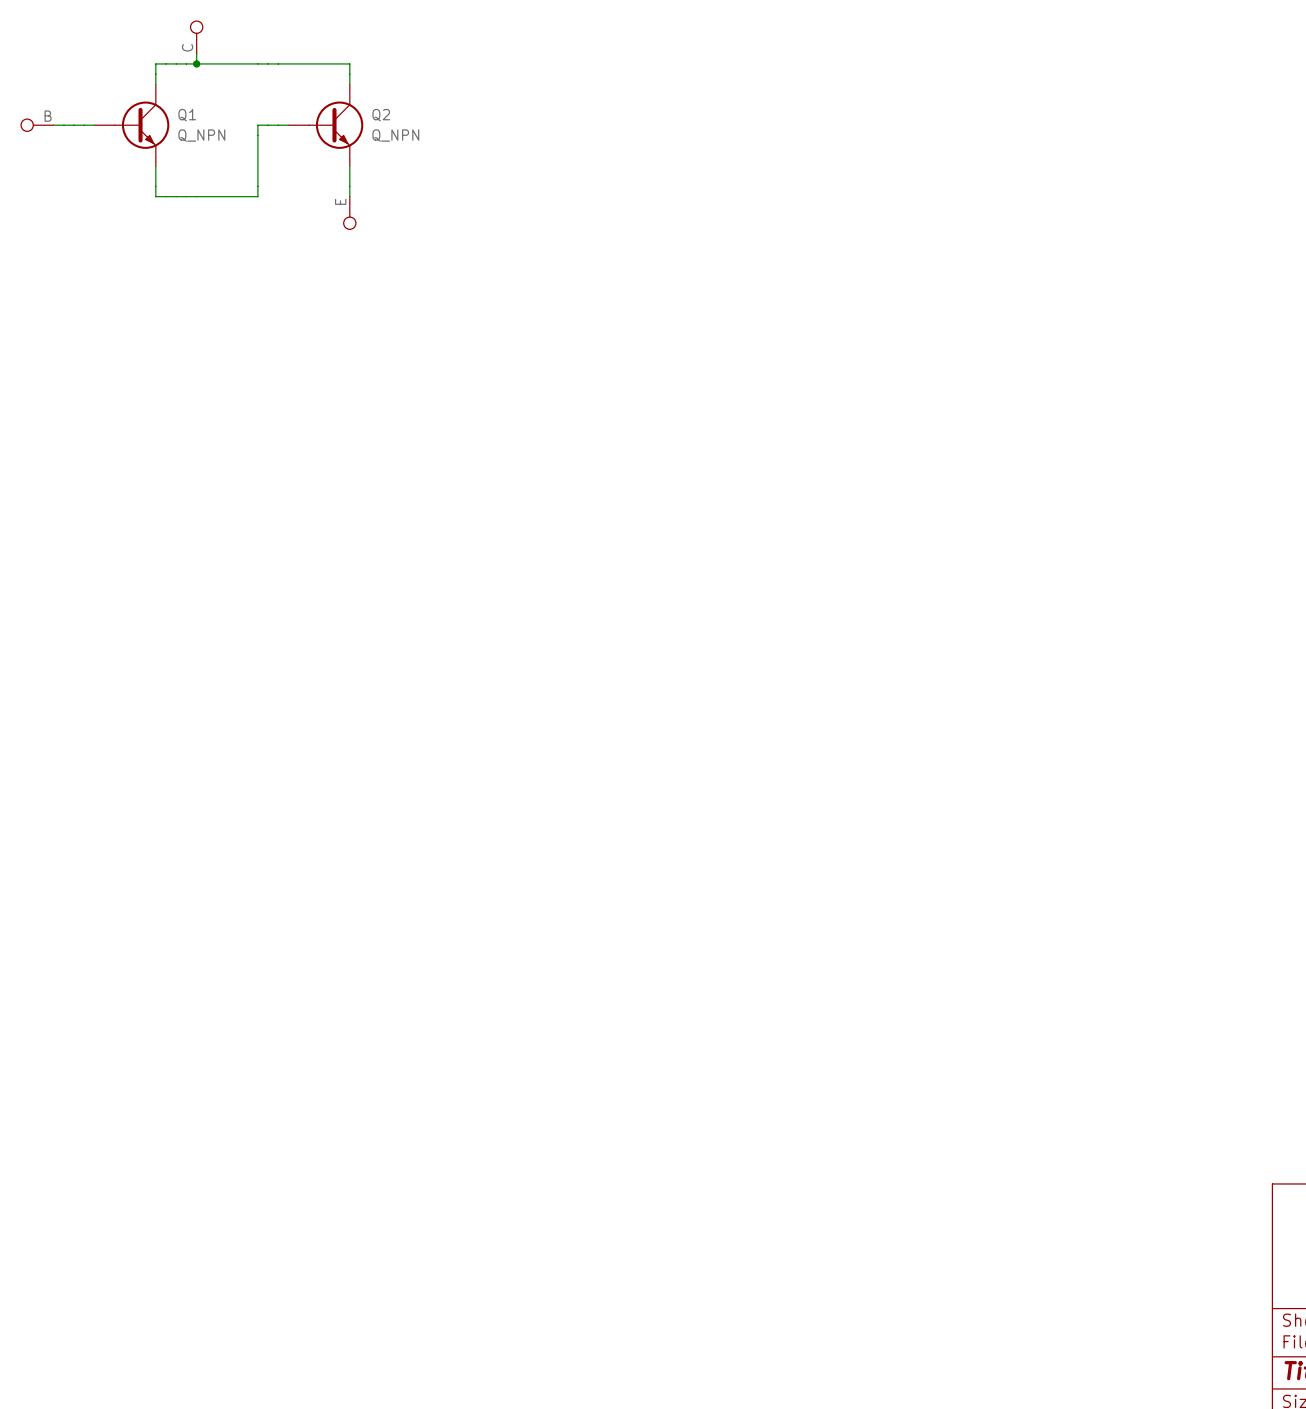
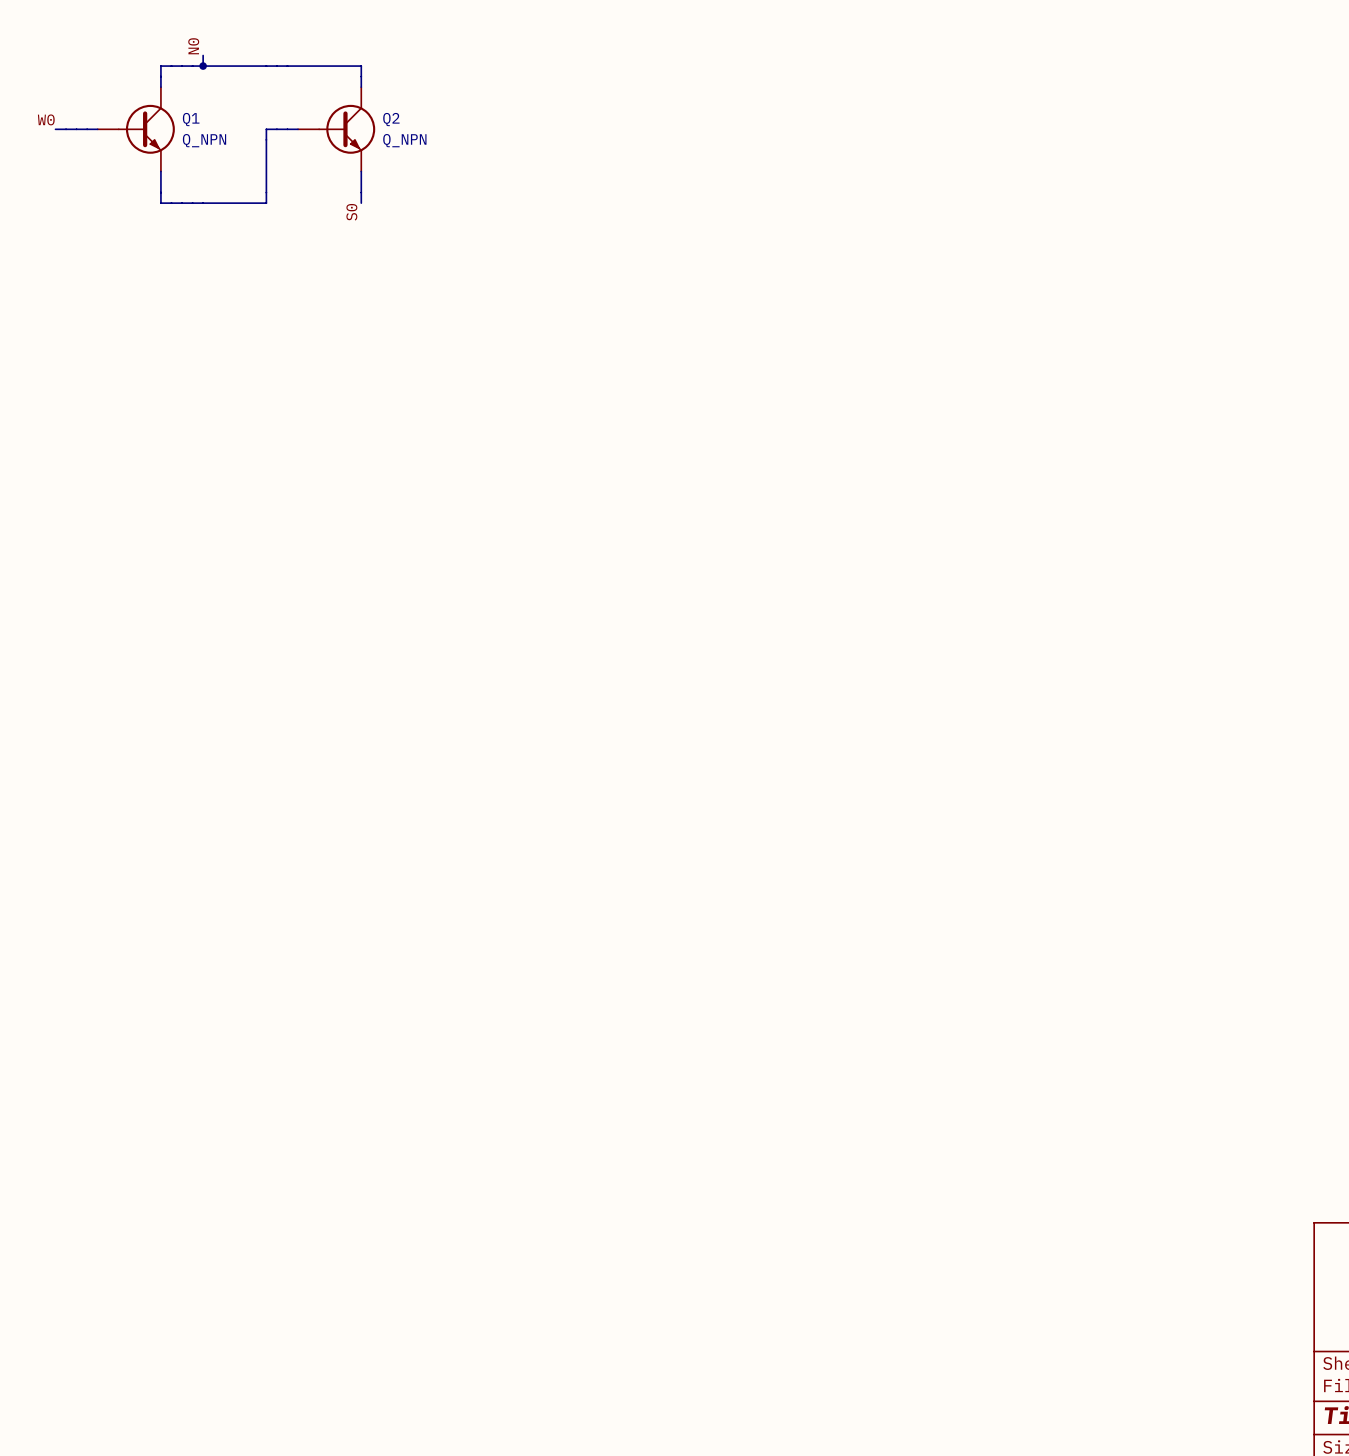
part: (196, 37) -> none
label: C (187, 47) -> N0 (193, 46)
label: B (48, 116) -> W0 (46, 119)
part: (37, 125) -> none
label: E (340, 201) -> S0 (351, 212)
part: (349, 213) -> none

